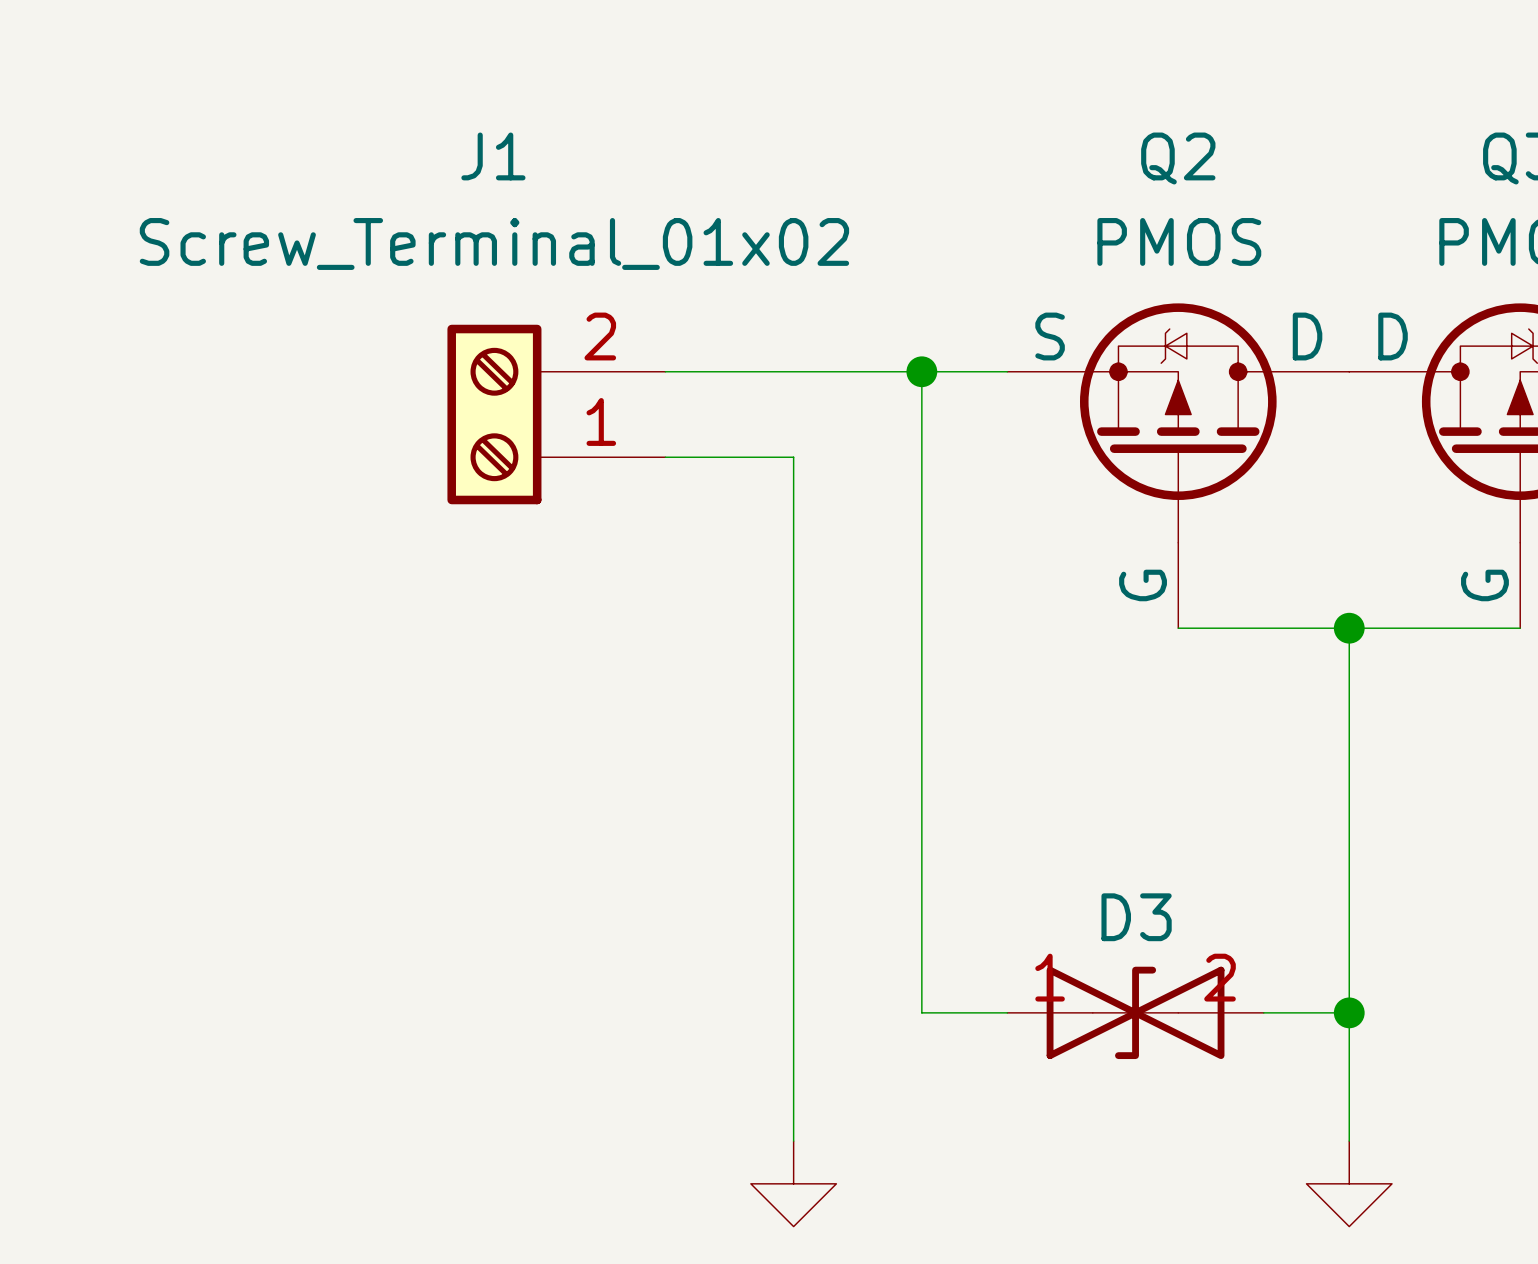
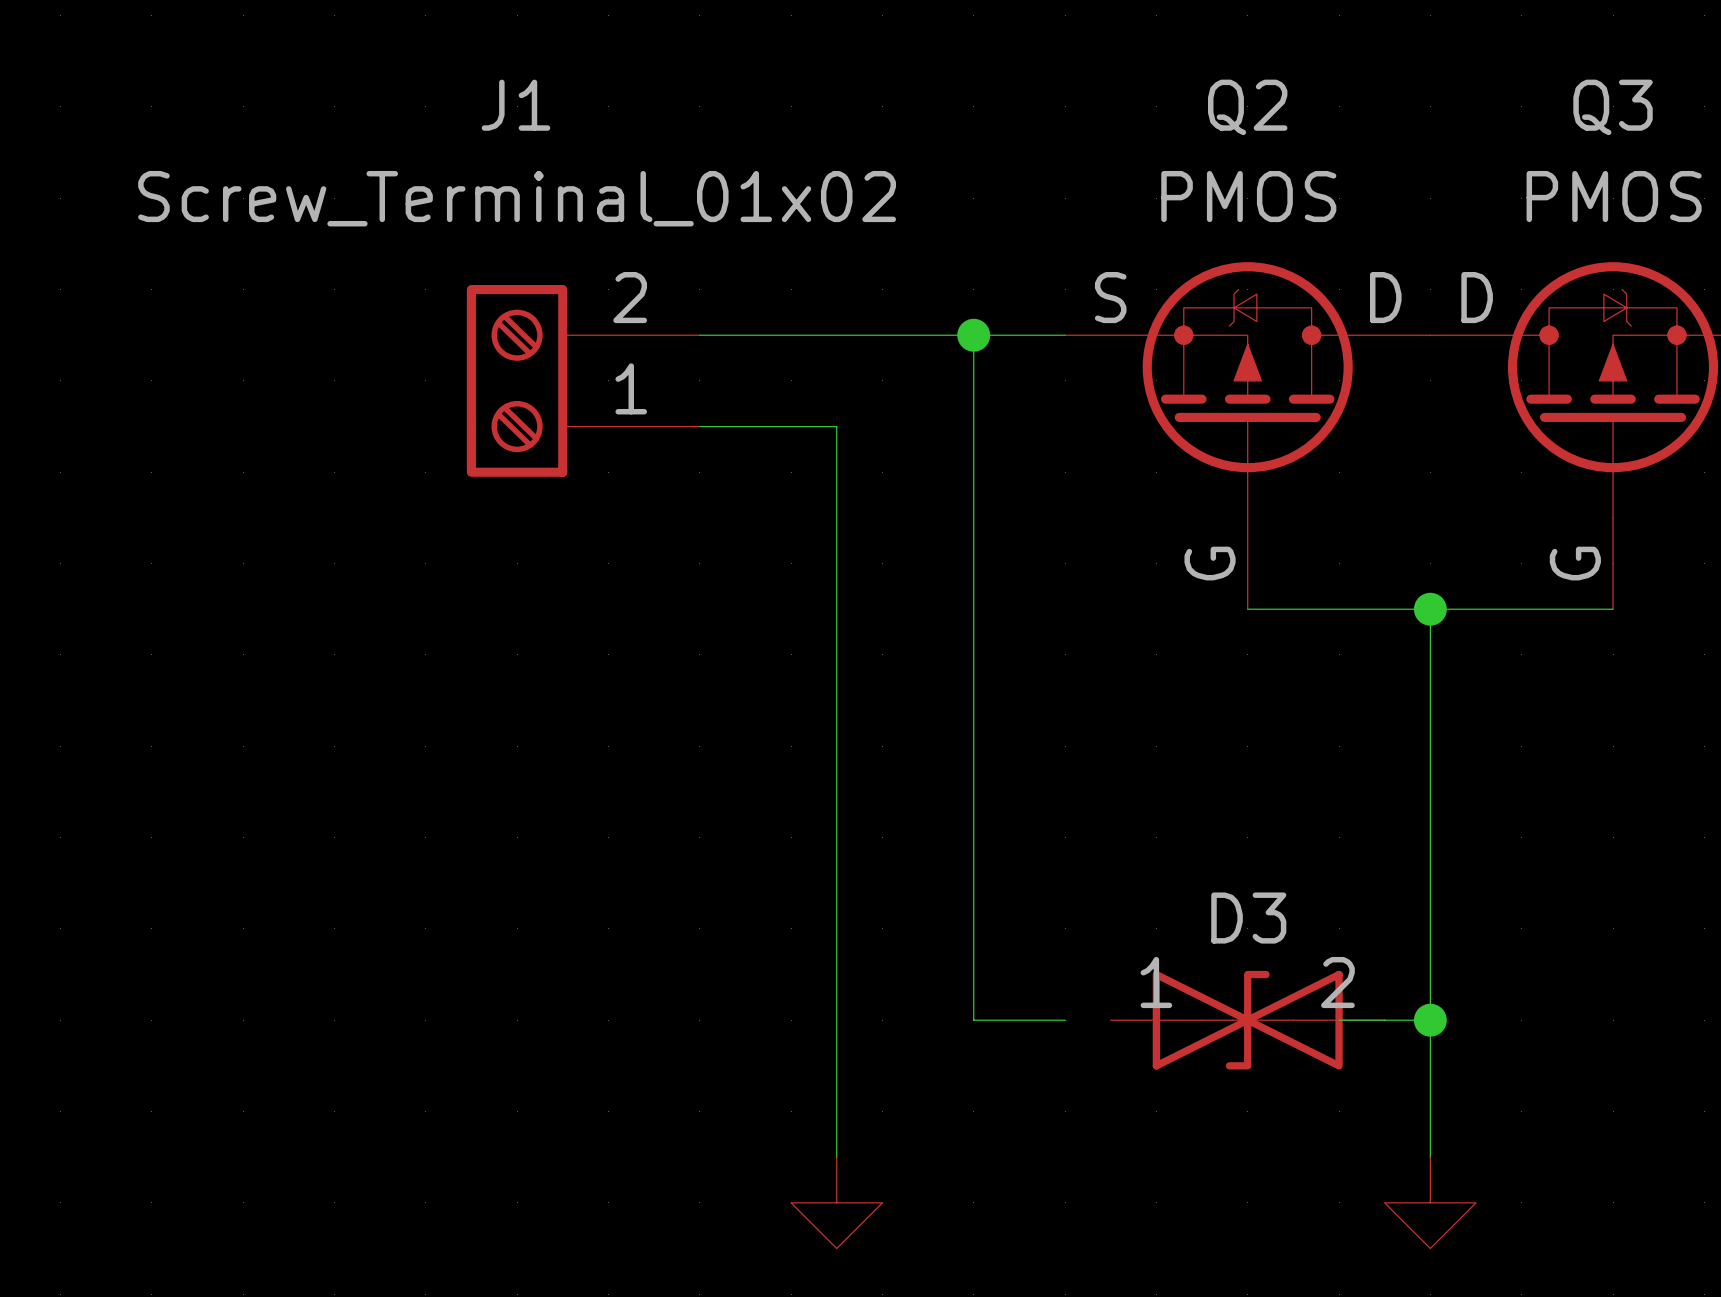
D3 position: (1135, 1012) -> (1247, 1020)

